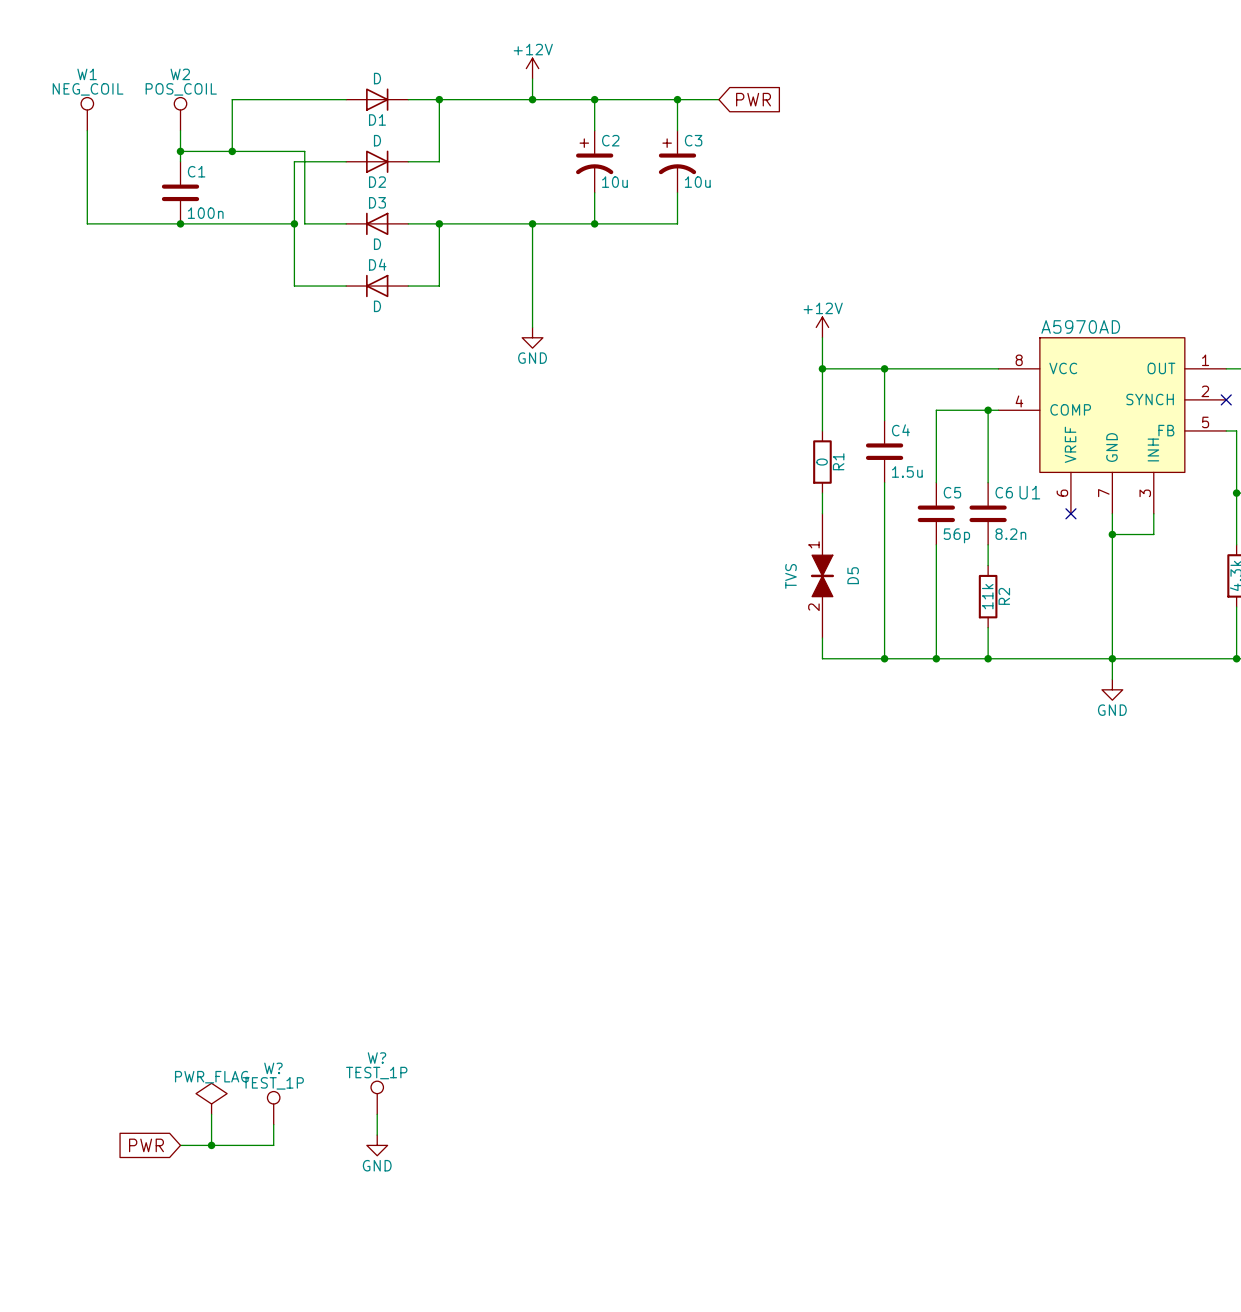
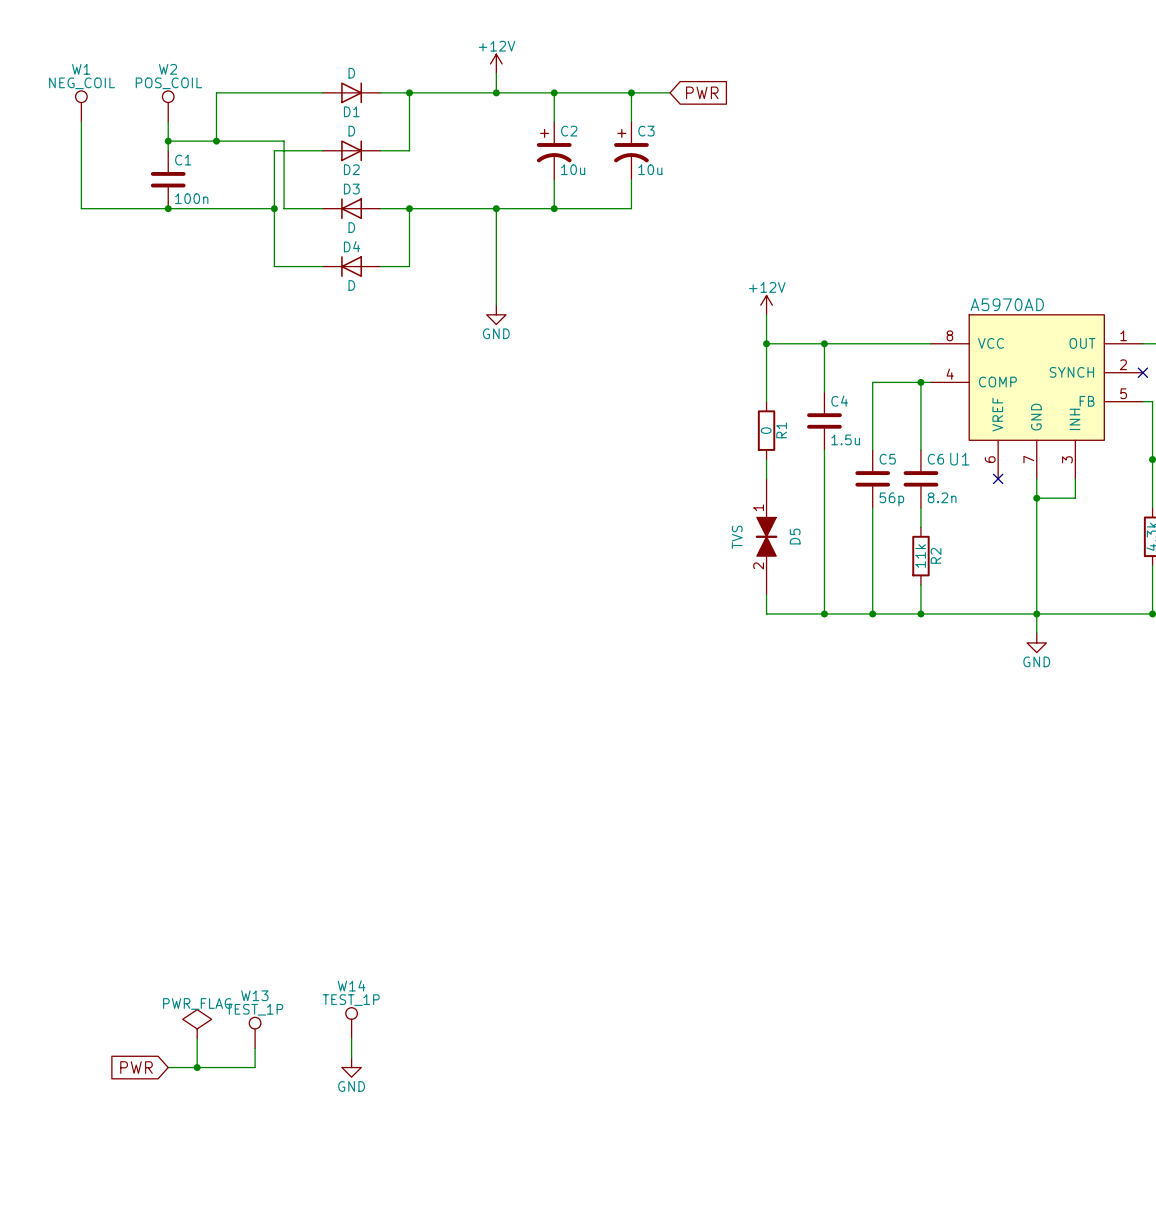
W? name: W? (376, 1058) -> W14 (351, 985)
W? name: W? (273, 1068) -> W13 (254, 995)

